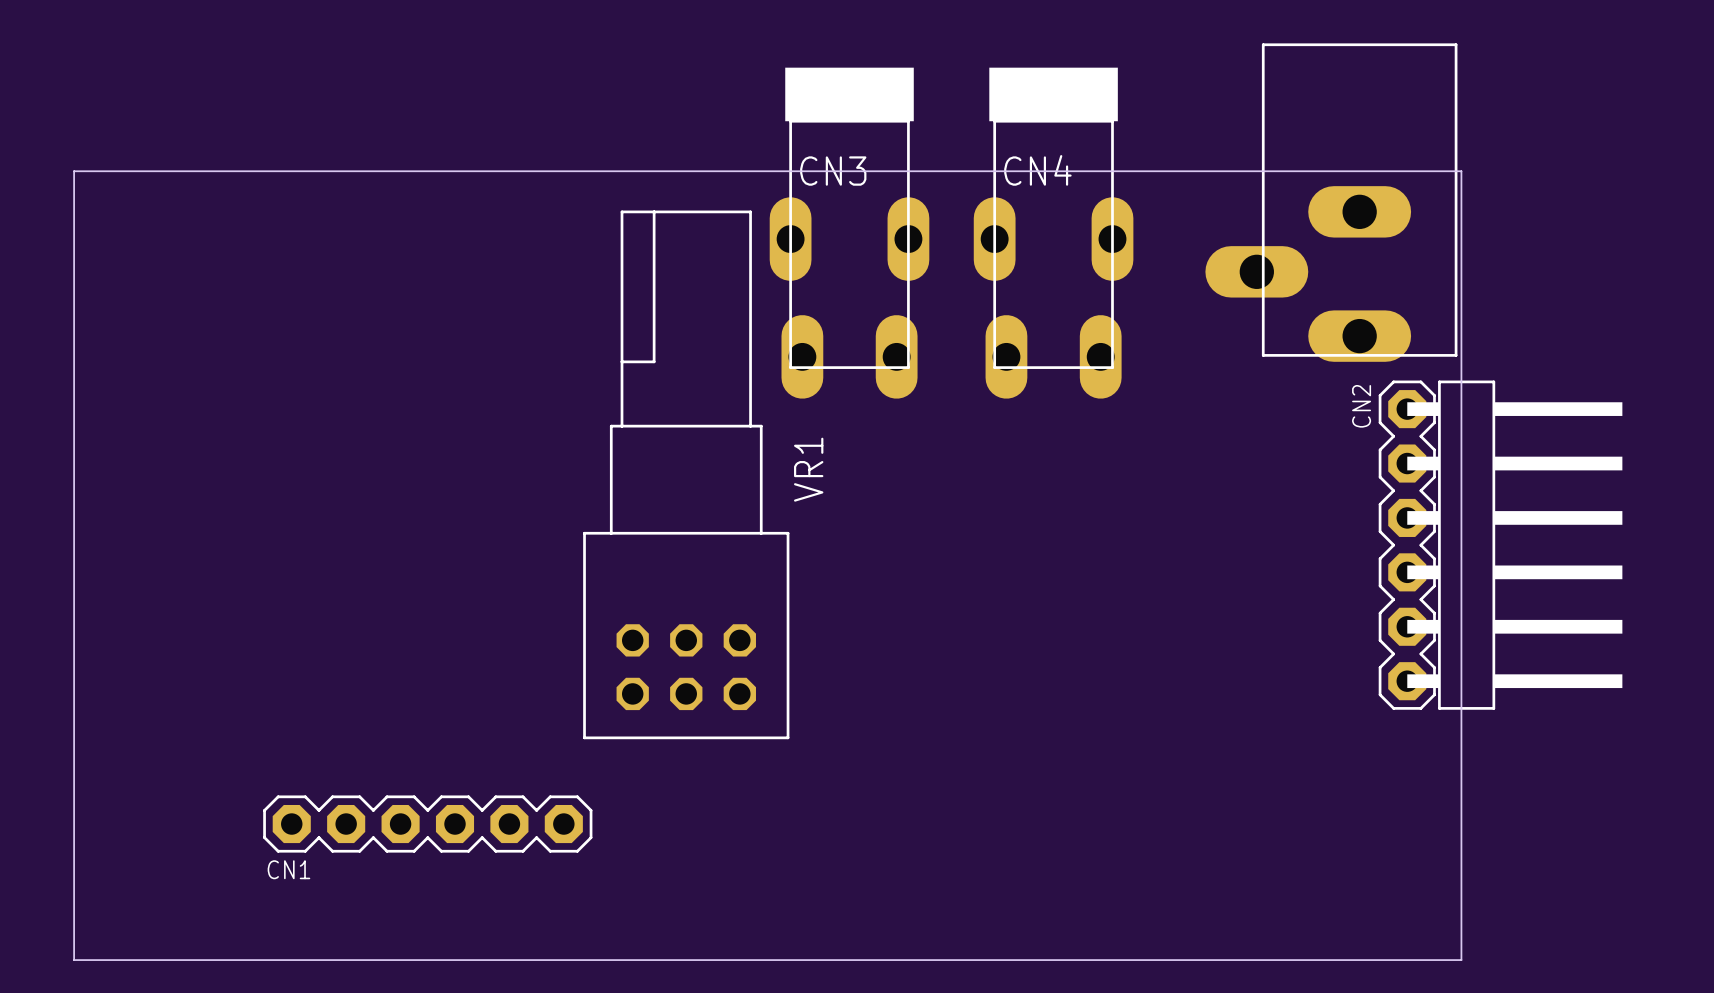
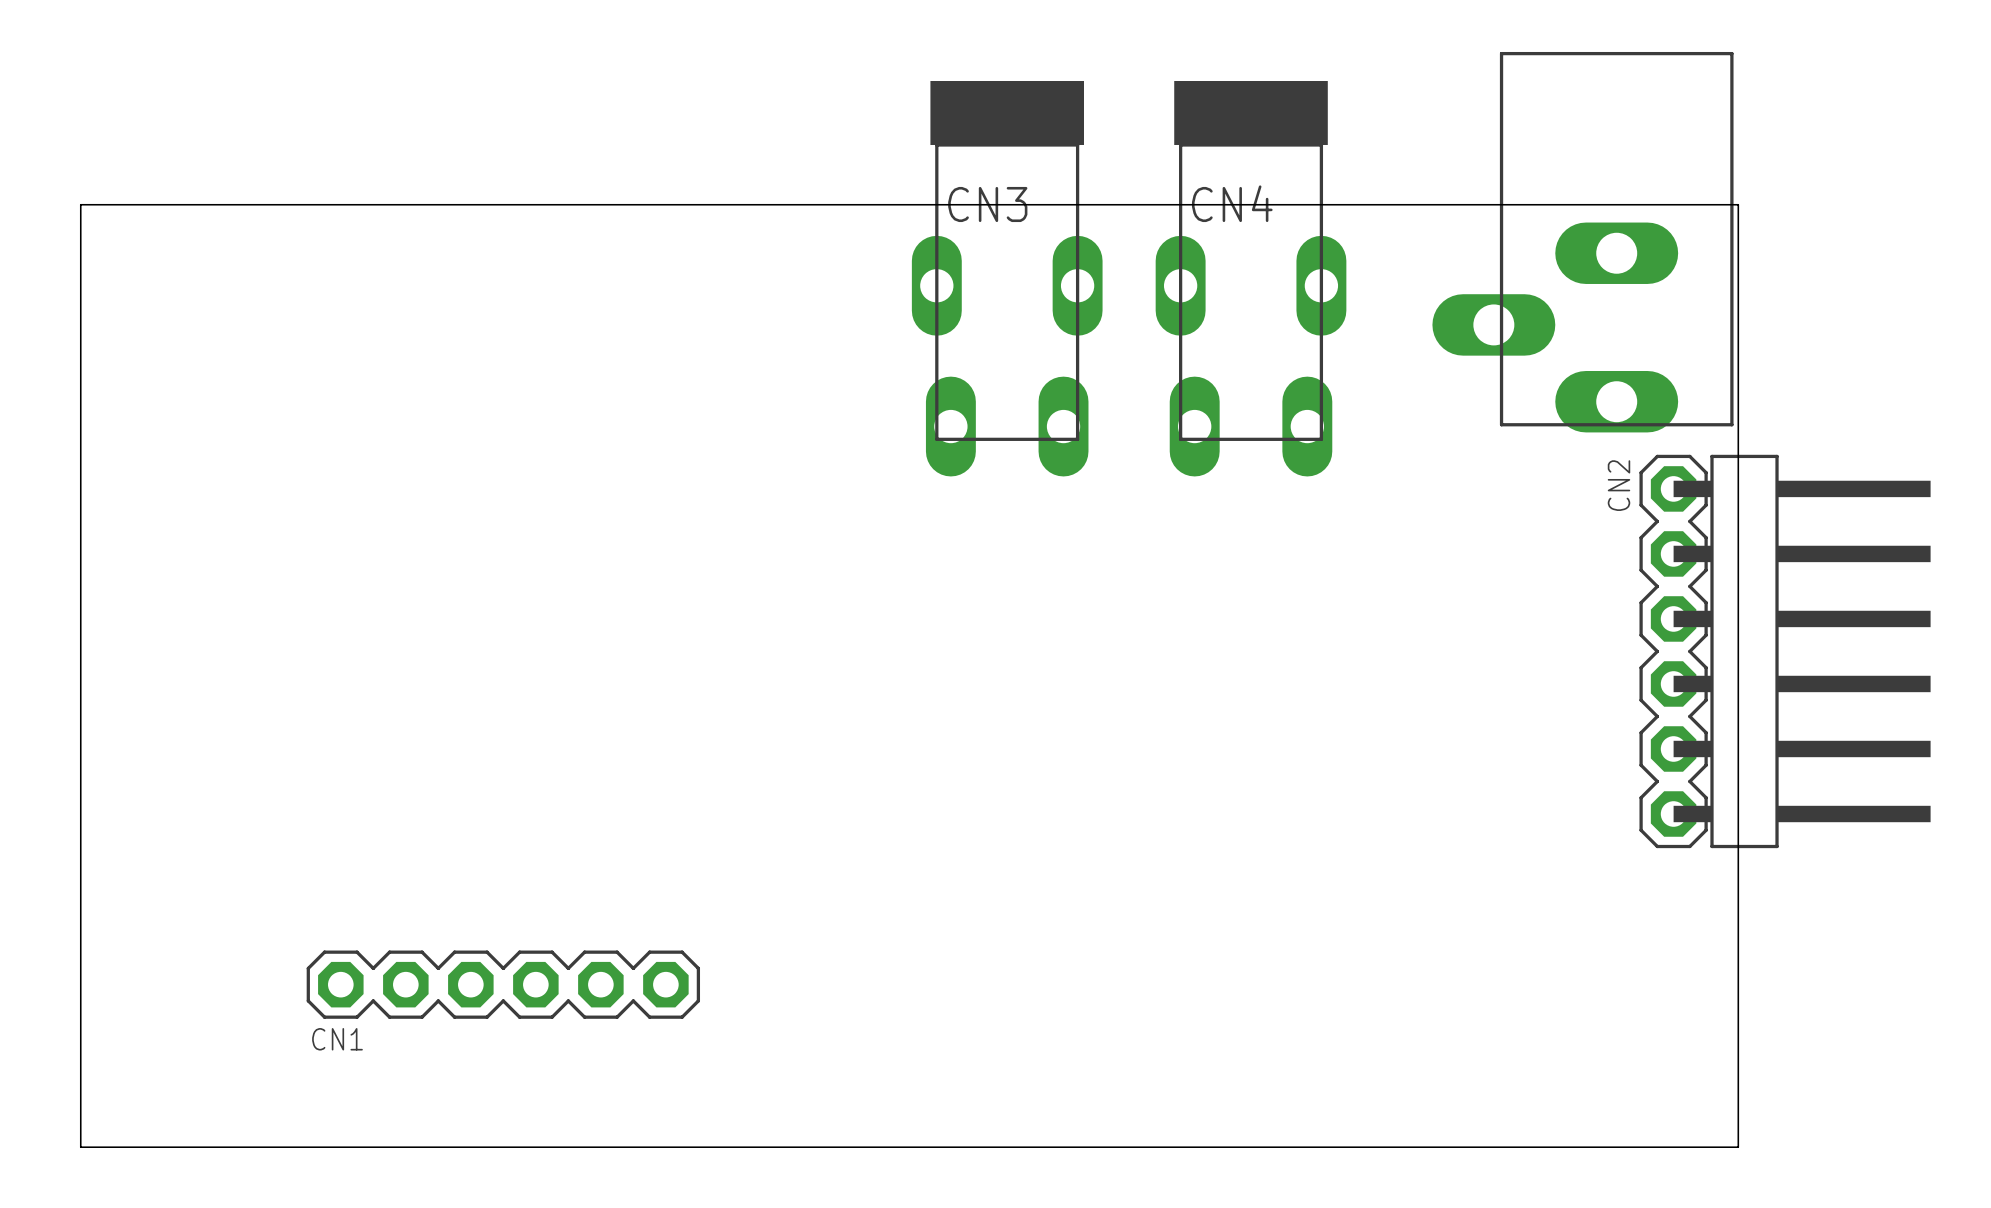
VR1: (686, 474) -> none

